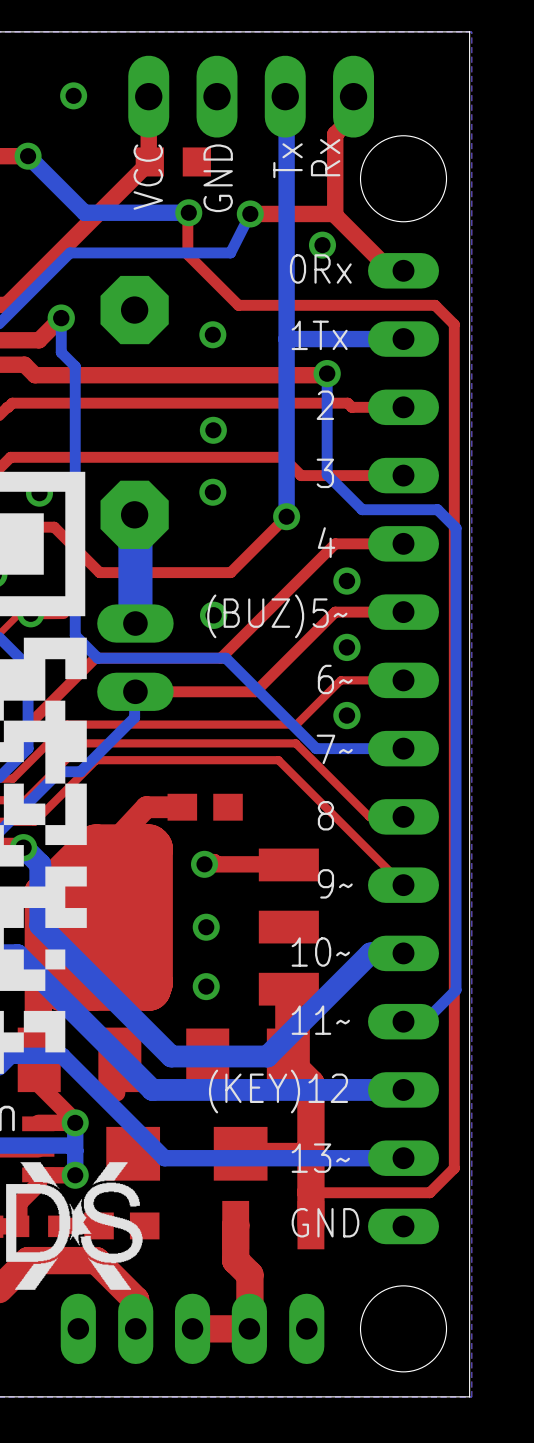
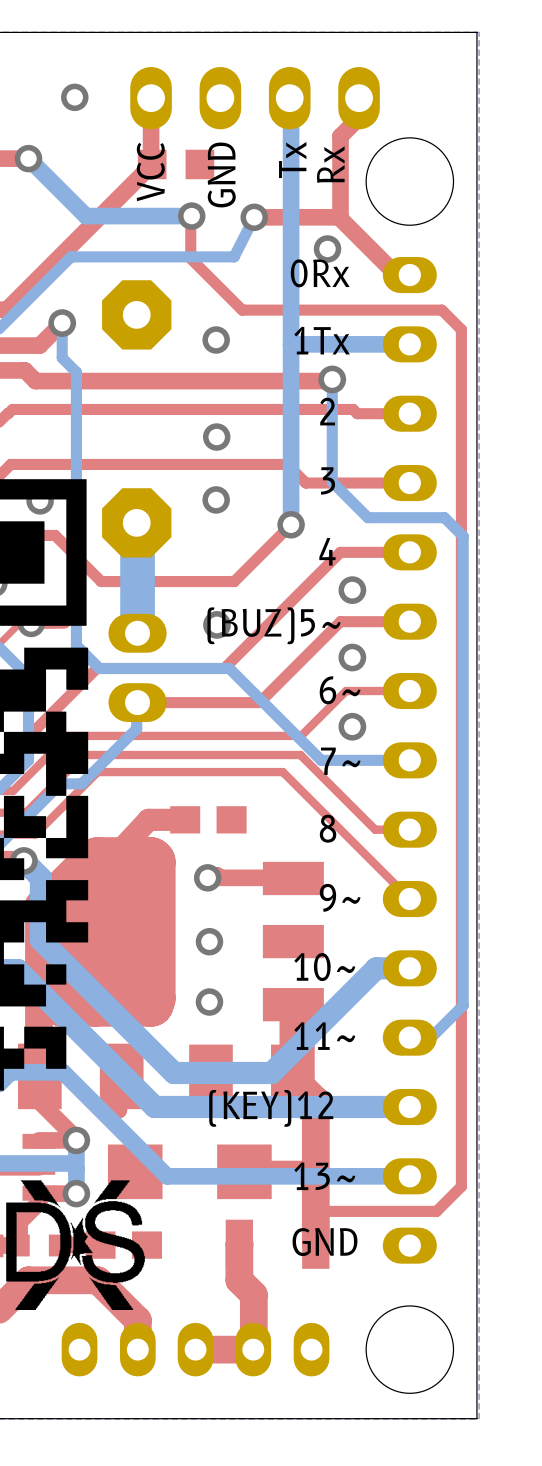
part footprint: [128, 55, 375, 138] -> [130, 66, 380, 130]
part footprint: [368, 253, 440, 1245] -> [382, 257, 437, 1264]
part footprint: [97, 604, 174, 711] -> [108, 613, 167, 723]
part footprint: [60, 1293, 325, 1365] -> [61, 1322, 330, 1377]

